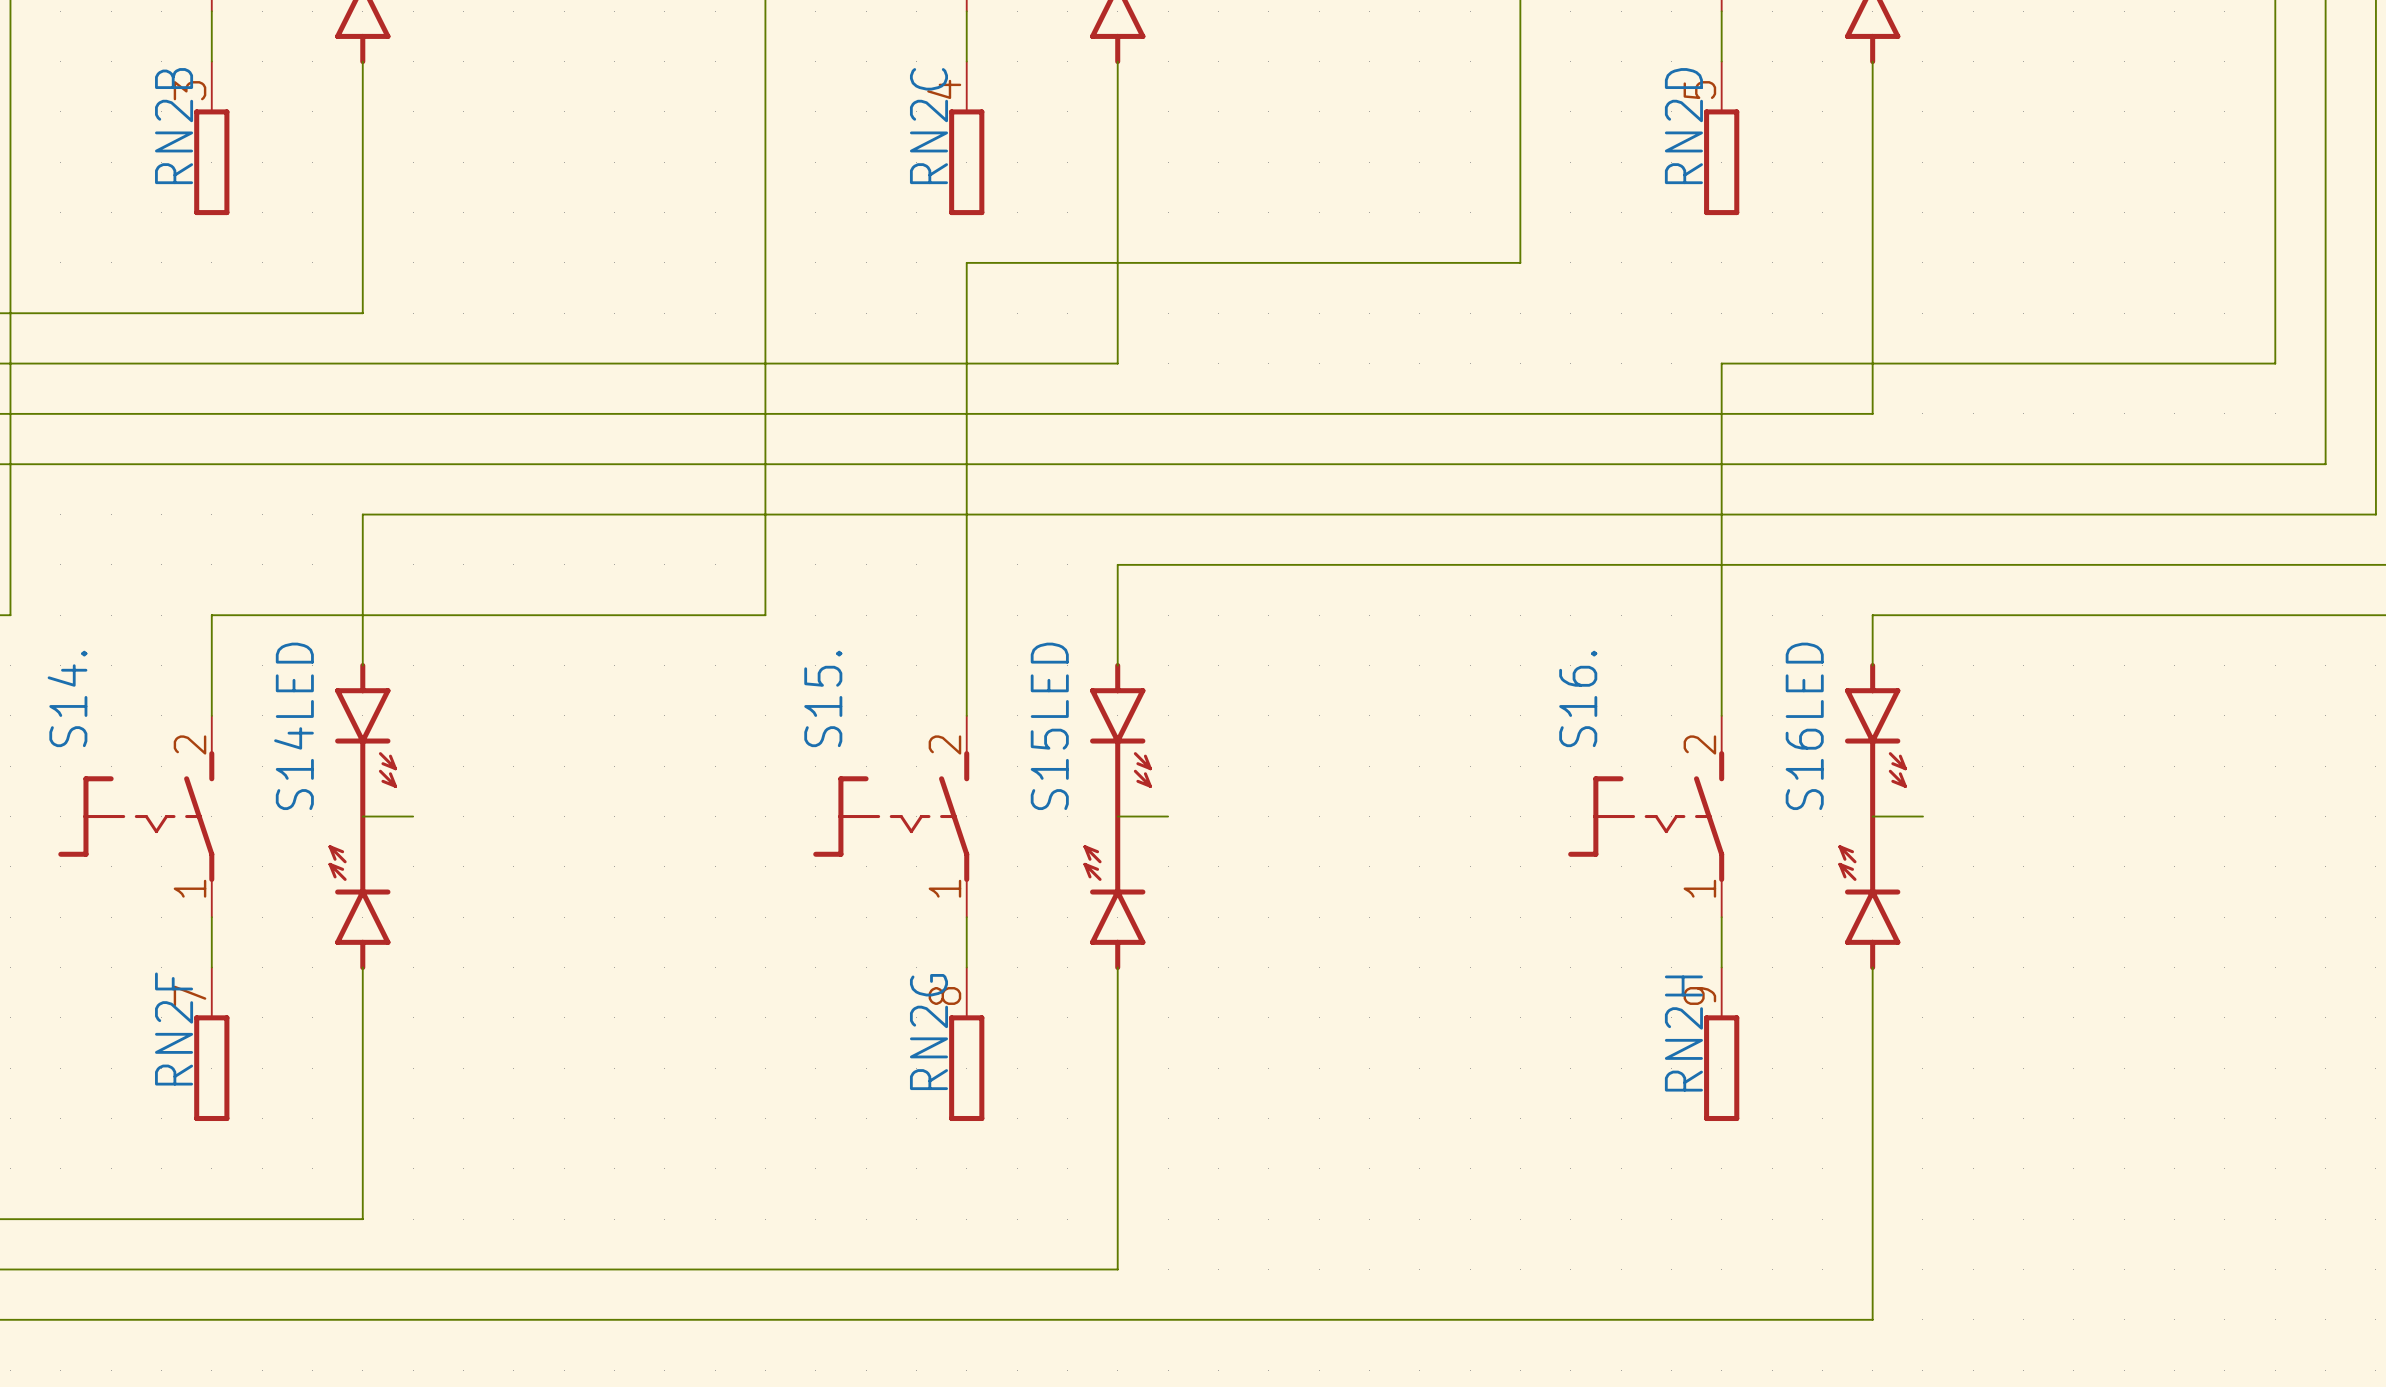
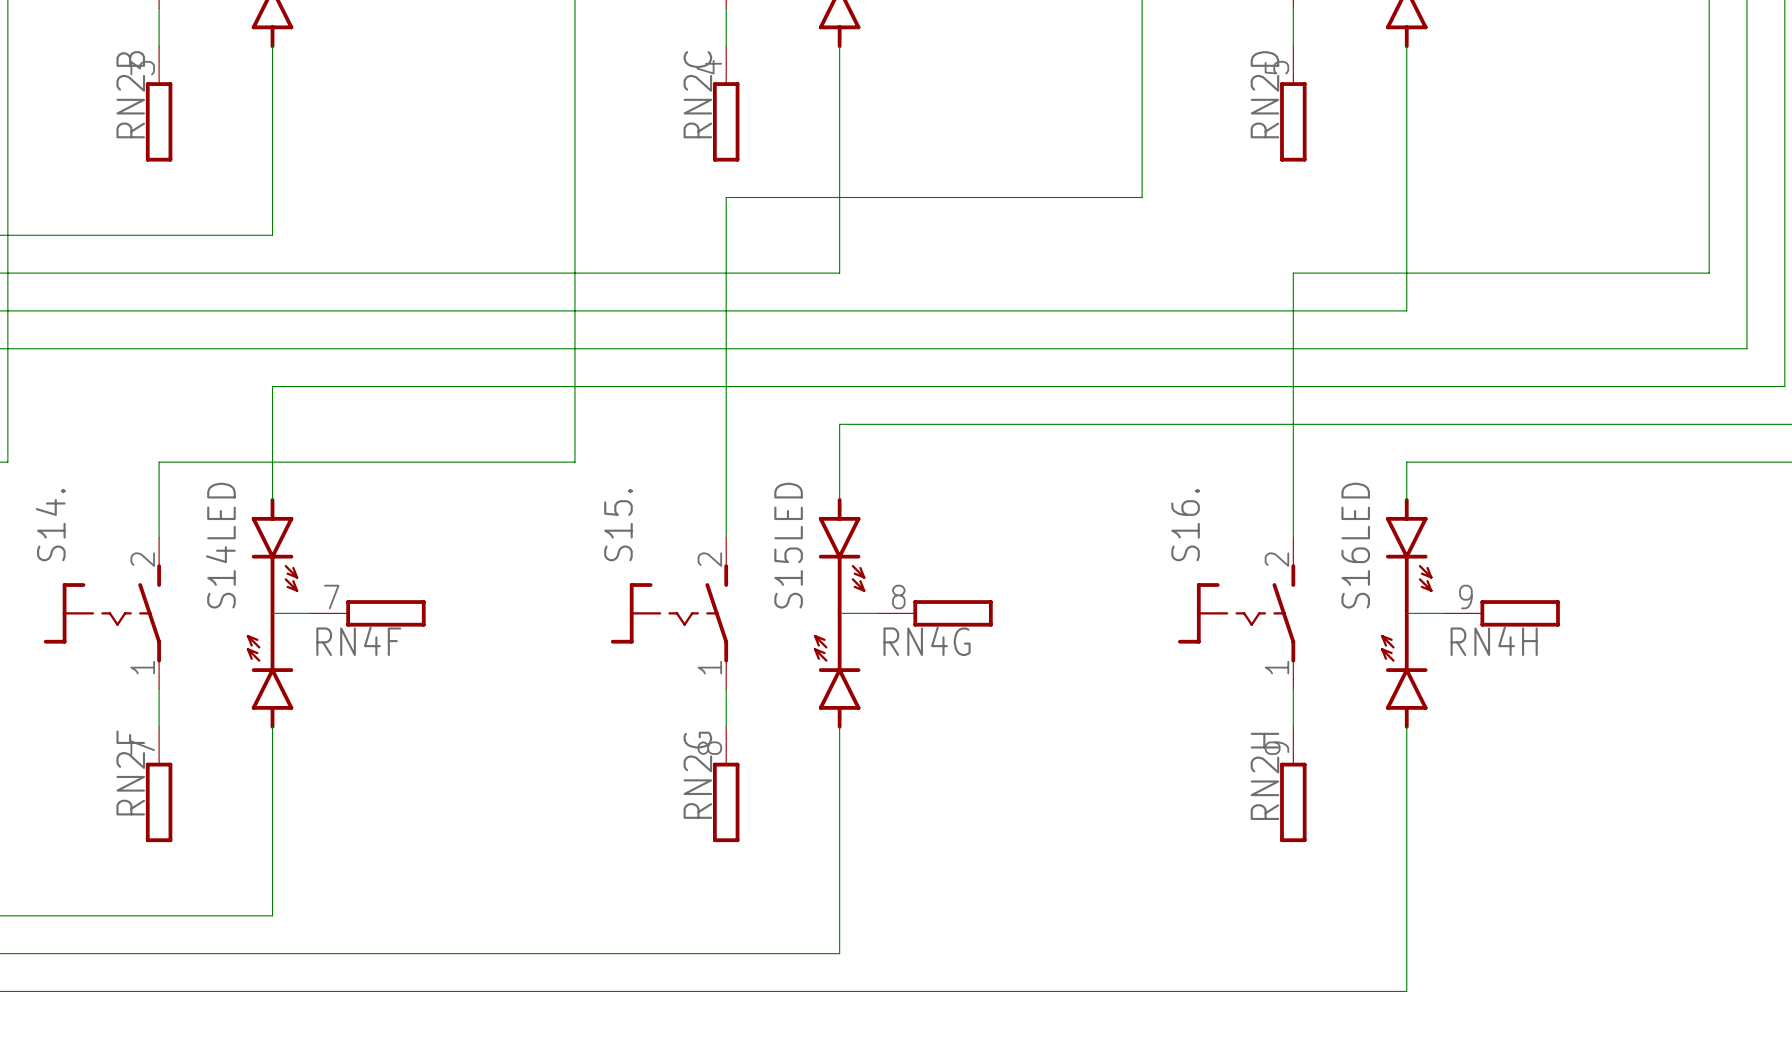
RN4F: none -> (367, 613)
RN4G: none -> (935, 613)
RN4H: none -> (1502, 613)

